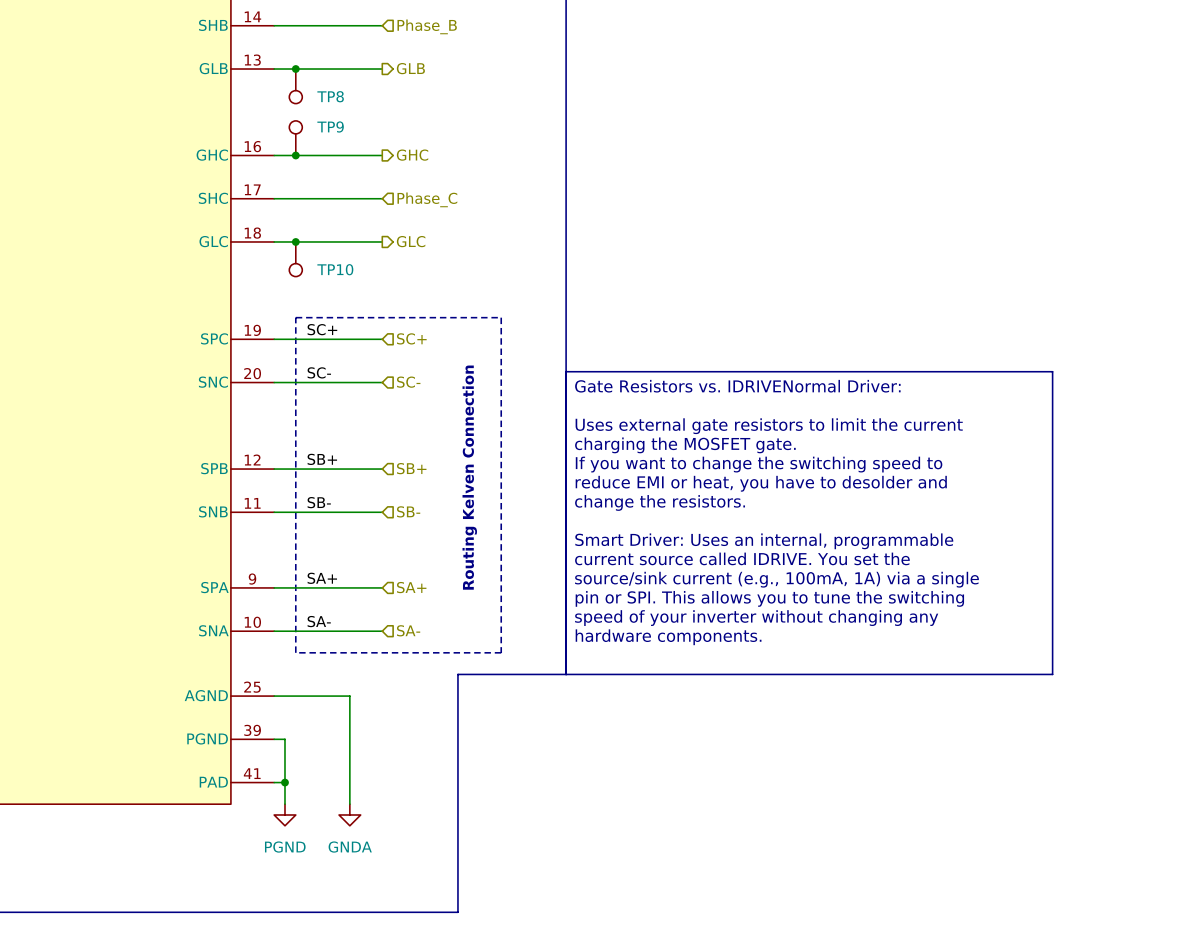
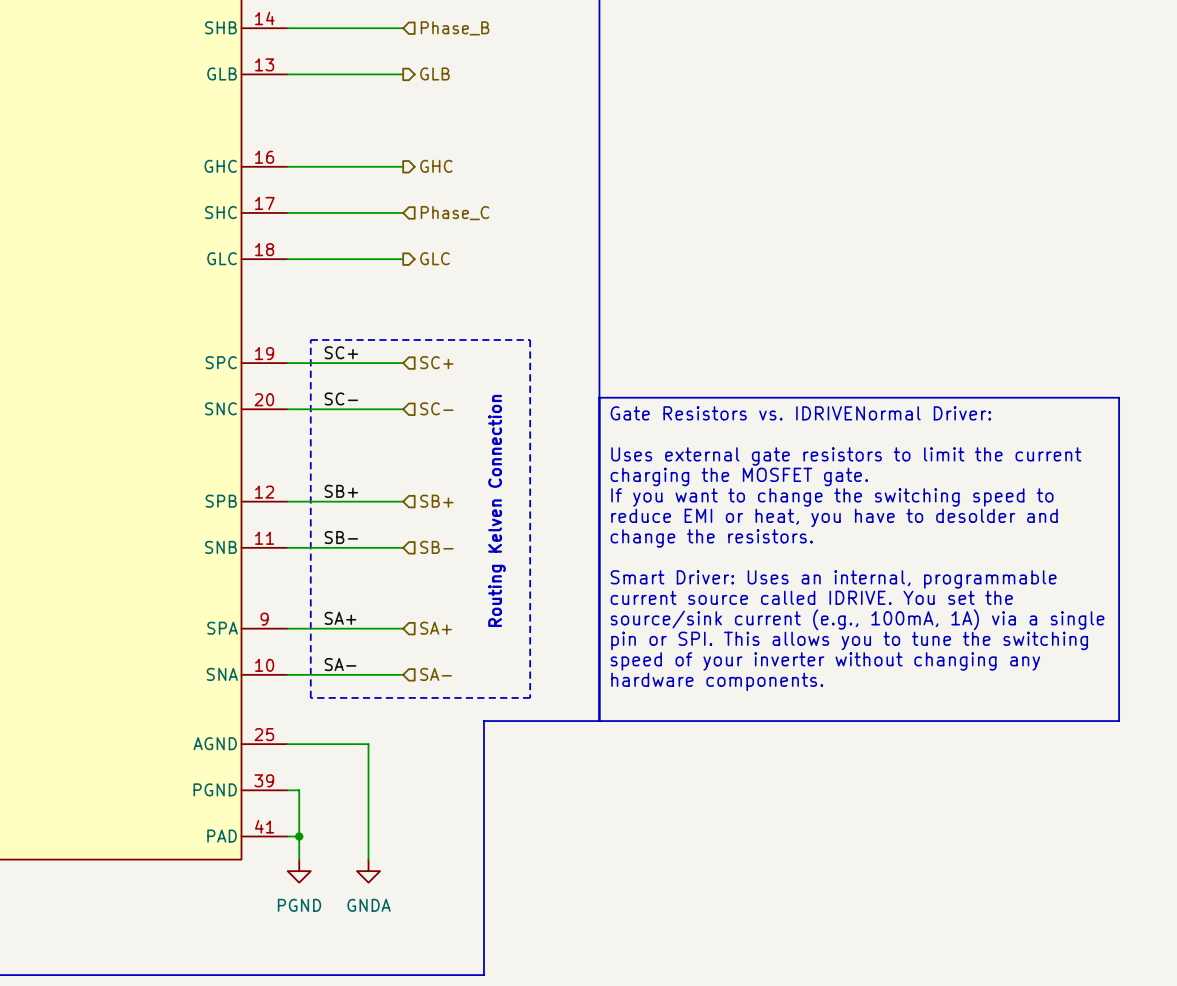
junction: (295, 69) -> none
TP8: (295, 86) -> none
TP9: (295, 138) -> none
junction: (295, 155) -> none
junction: (295, 241) -> none
TP10: (295, 259) -> none

